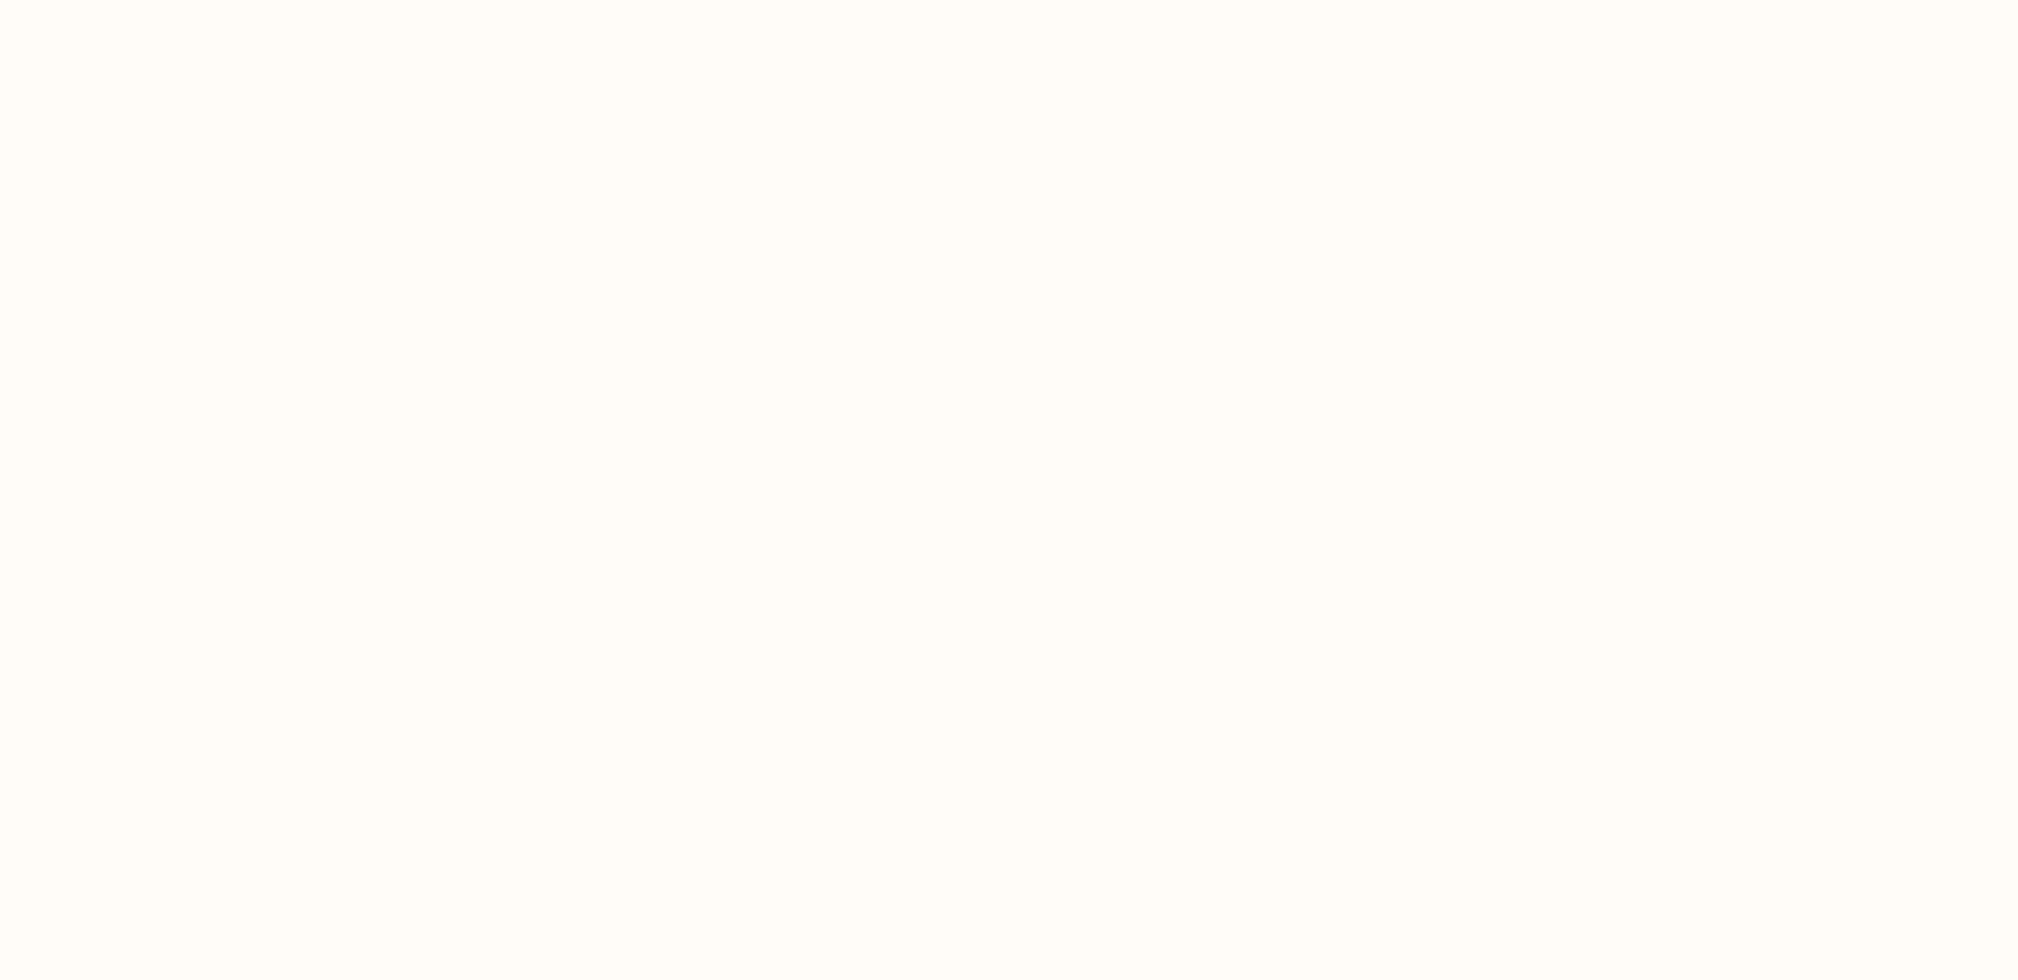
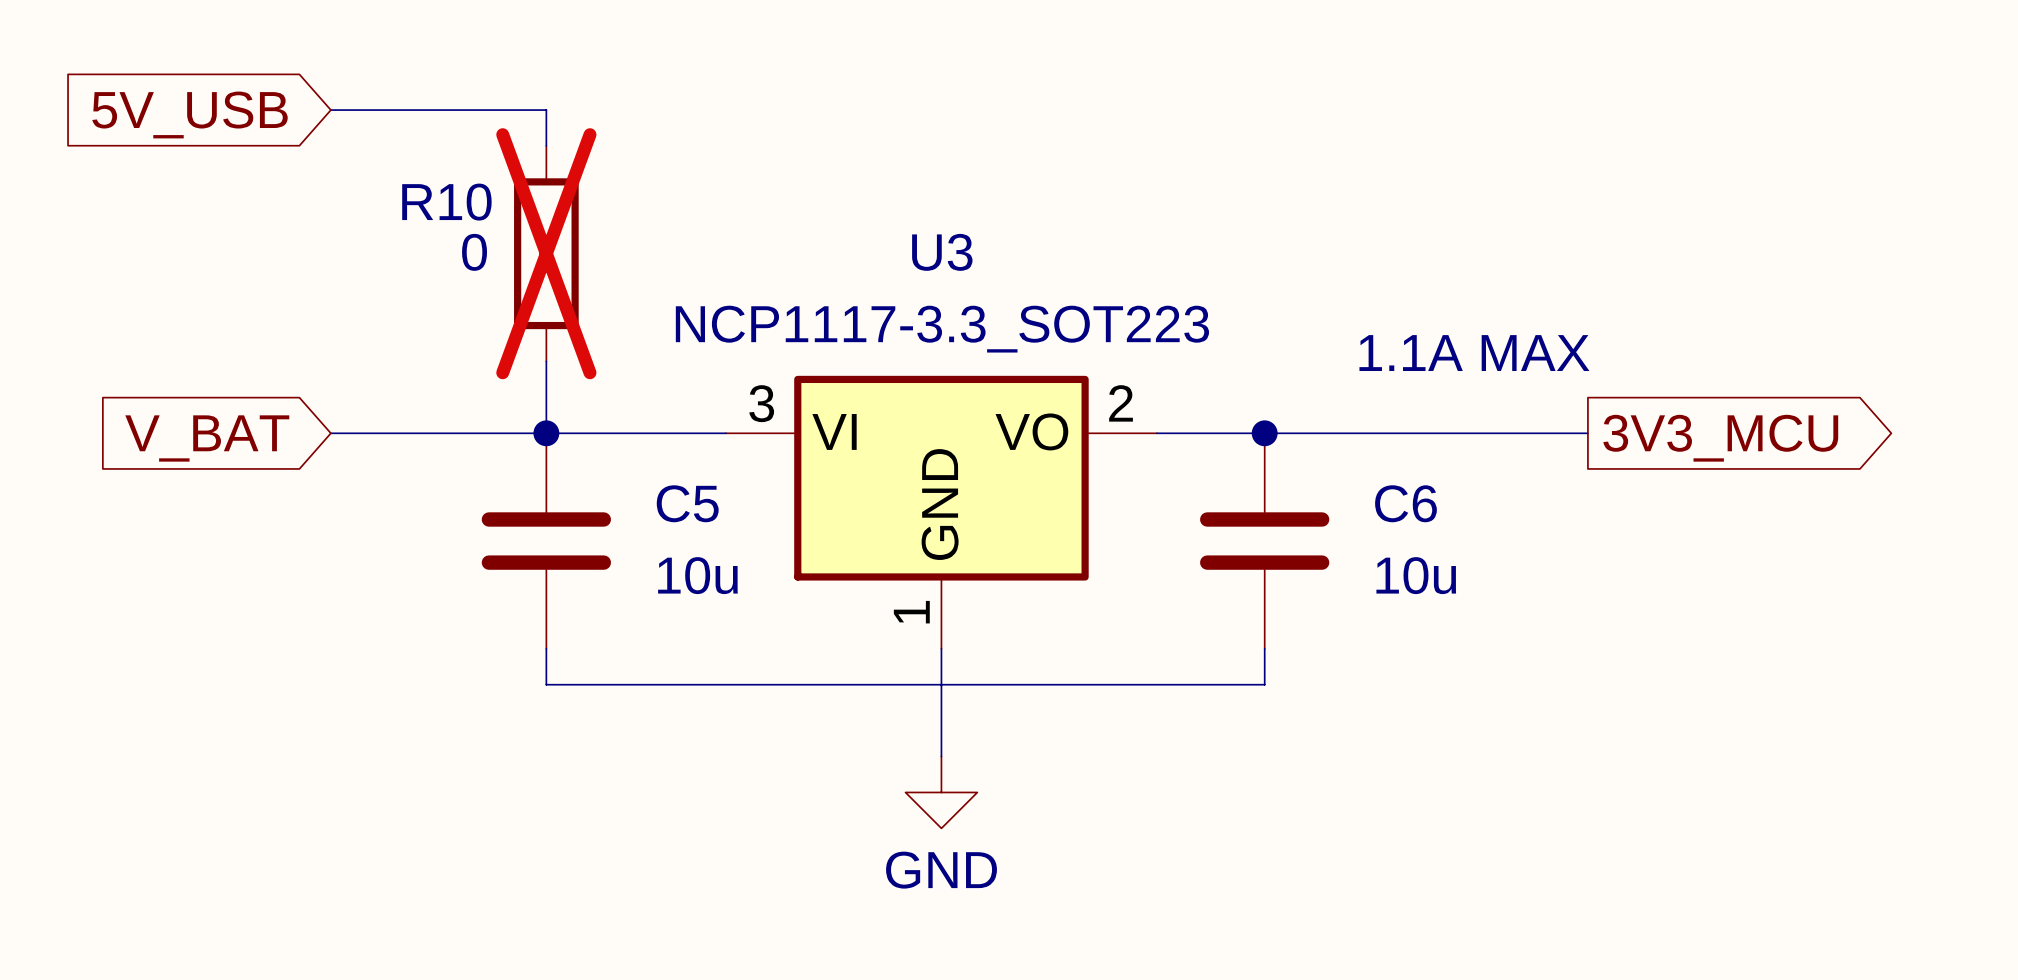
wire: none -> (330, 110) (546, 110) (546, 145)
global label: none -> 5V_USB (190, 114)
R10: none -> 0 (546, 253)
text: none -> 1.1A MAX (1474, 353)
wire: none -> (546, 361) (546, 433)
wire: none -> (330, 433) (725, 433)
junction: none -> (546, 433)
wire: none -> (1156, 433) (1587, 433)
junction: none -> (1264, 433)
global label: none -> V_BAT (207, 438)
global label: none -> 3V3_MCU (1720, 438)
U3: none -> NCP1117-3.3_SOT223 (941, 512)
C5: none -> 10u (546, 541)
C6: none -> 10u (1264, 541)
wire: none -> (546, 648) (546, 684) (1264, 684) (1264, 648)
wire: none -> (941, 648) (941, 756)
power symbol: none -> GND (941, 792)

